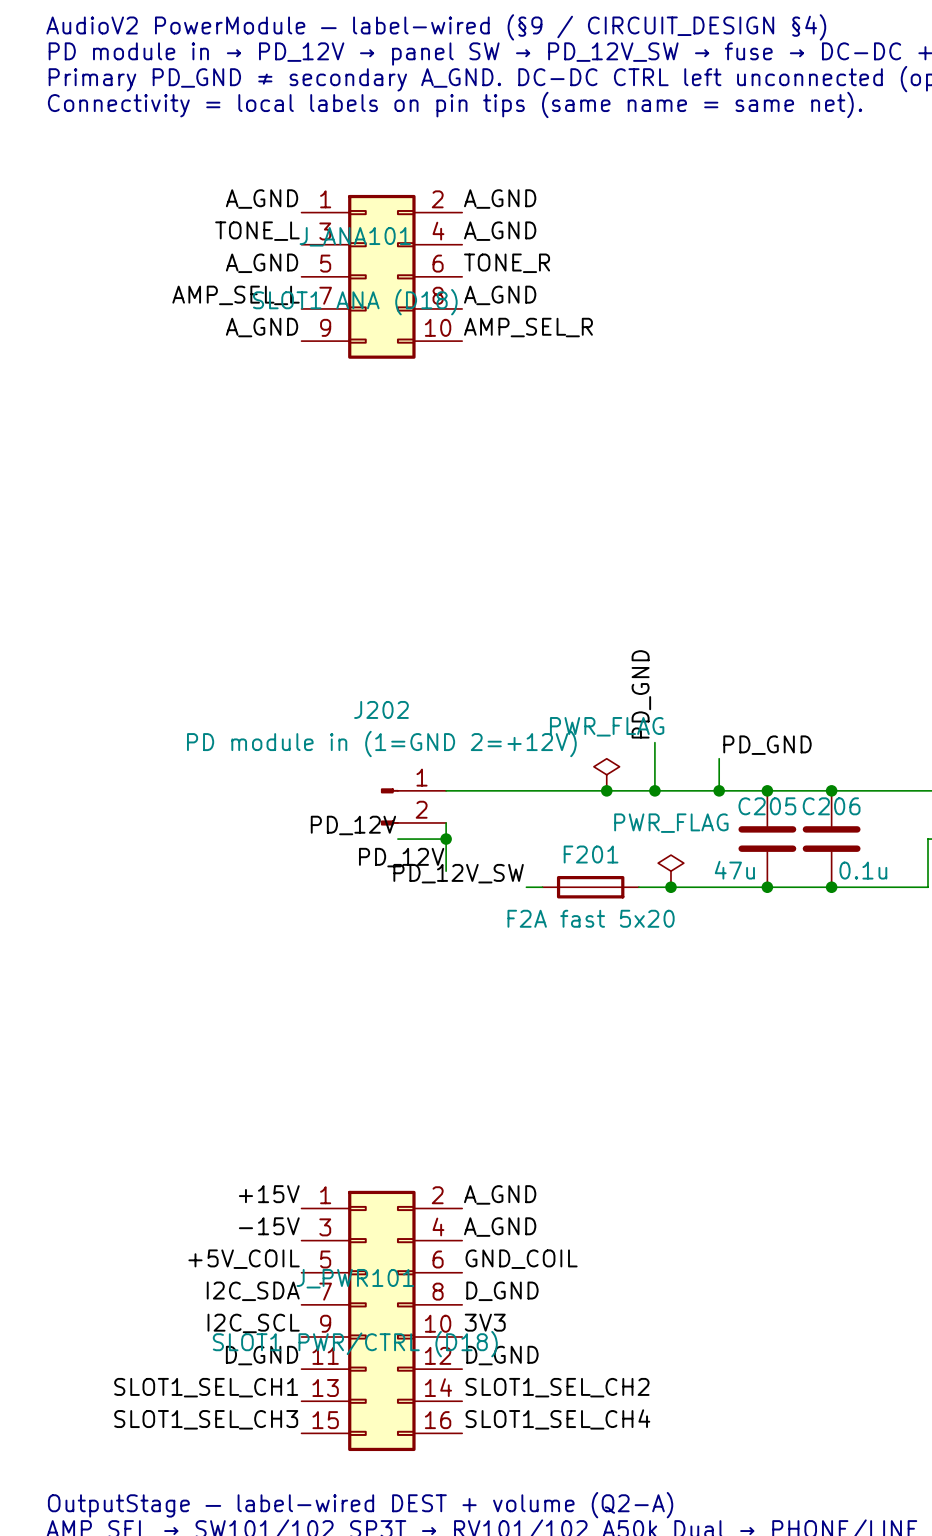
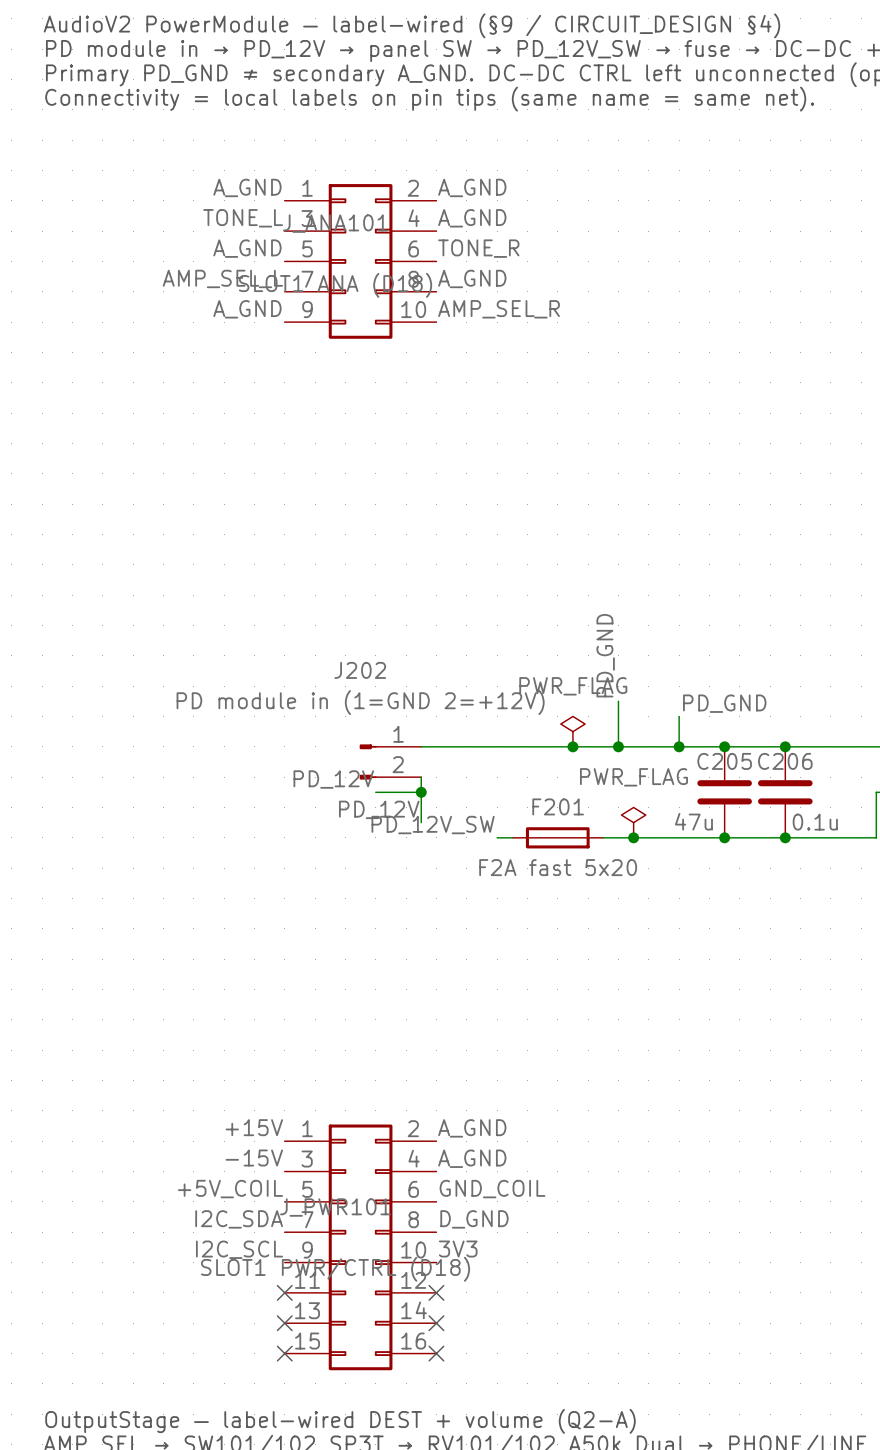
label: D_GND (262, 1355) -> none
label: D_GND (502, 1355) -> none
no-connect mark: none -> (284, 1292)
no-connect mark: none -> (436, 1292)
label: SLOT1_SEL_CH1 (206, 1387) -> none
label: SLOT1_SEL_CH2 (557, 1387) -> none
no-connect mark: none -> (284, 1323)
no-connect mark: none -> (436, 1323)
label: SLOT1_SEL_CH3 (206, 1419) -> none
label: SLOT1_SEL_CH4 (557, 1419) -> none
no-connect mark: none -> (284, 1353)
no-connect mark: none -> (436, 1353)

